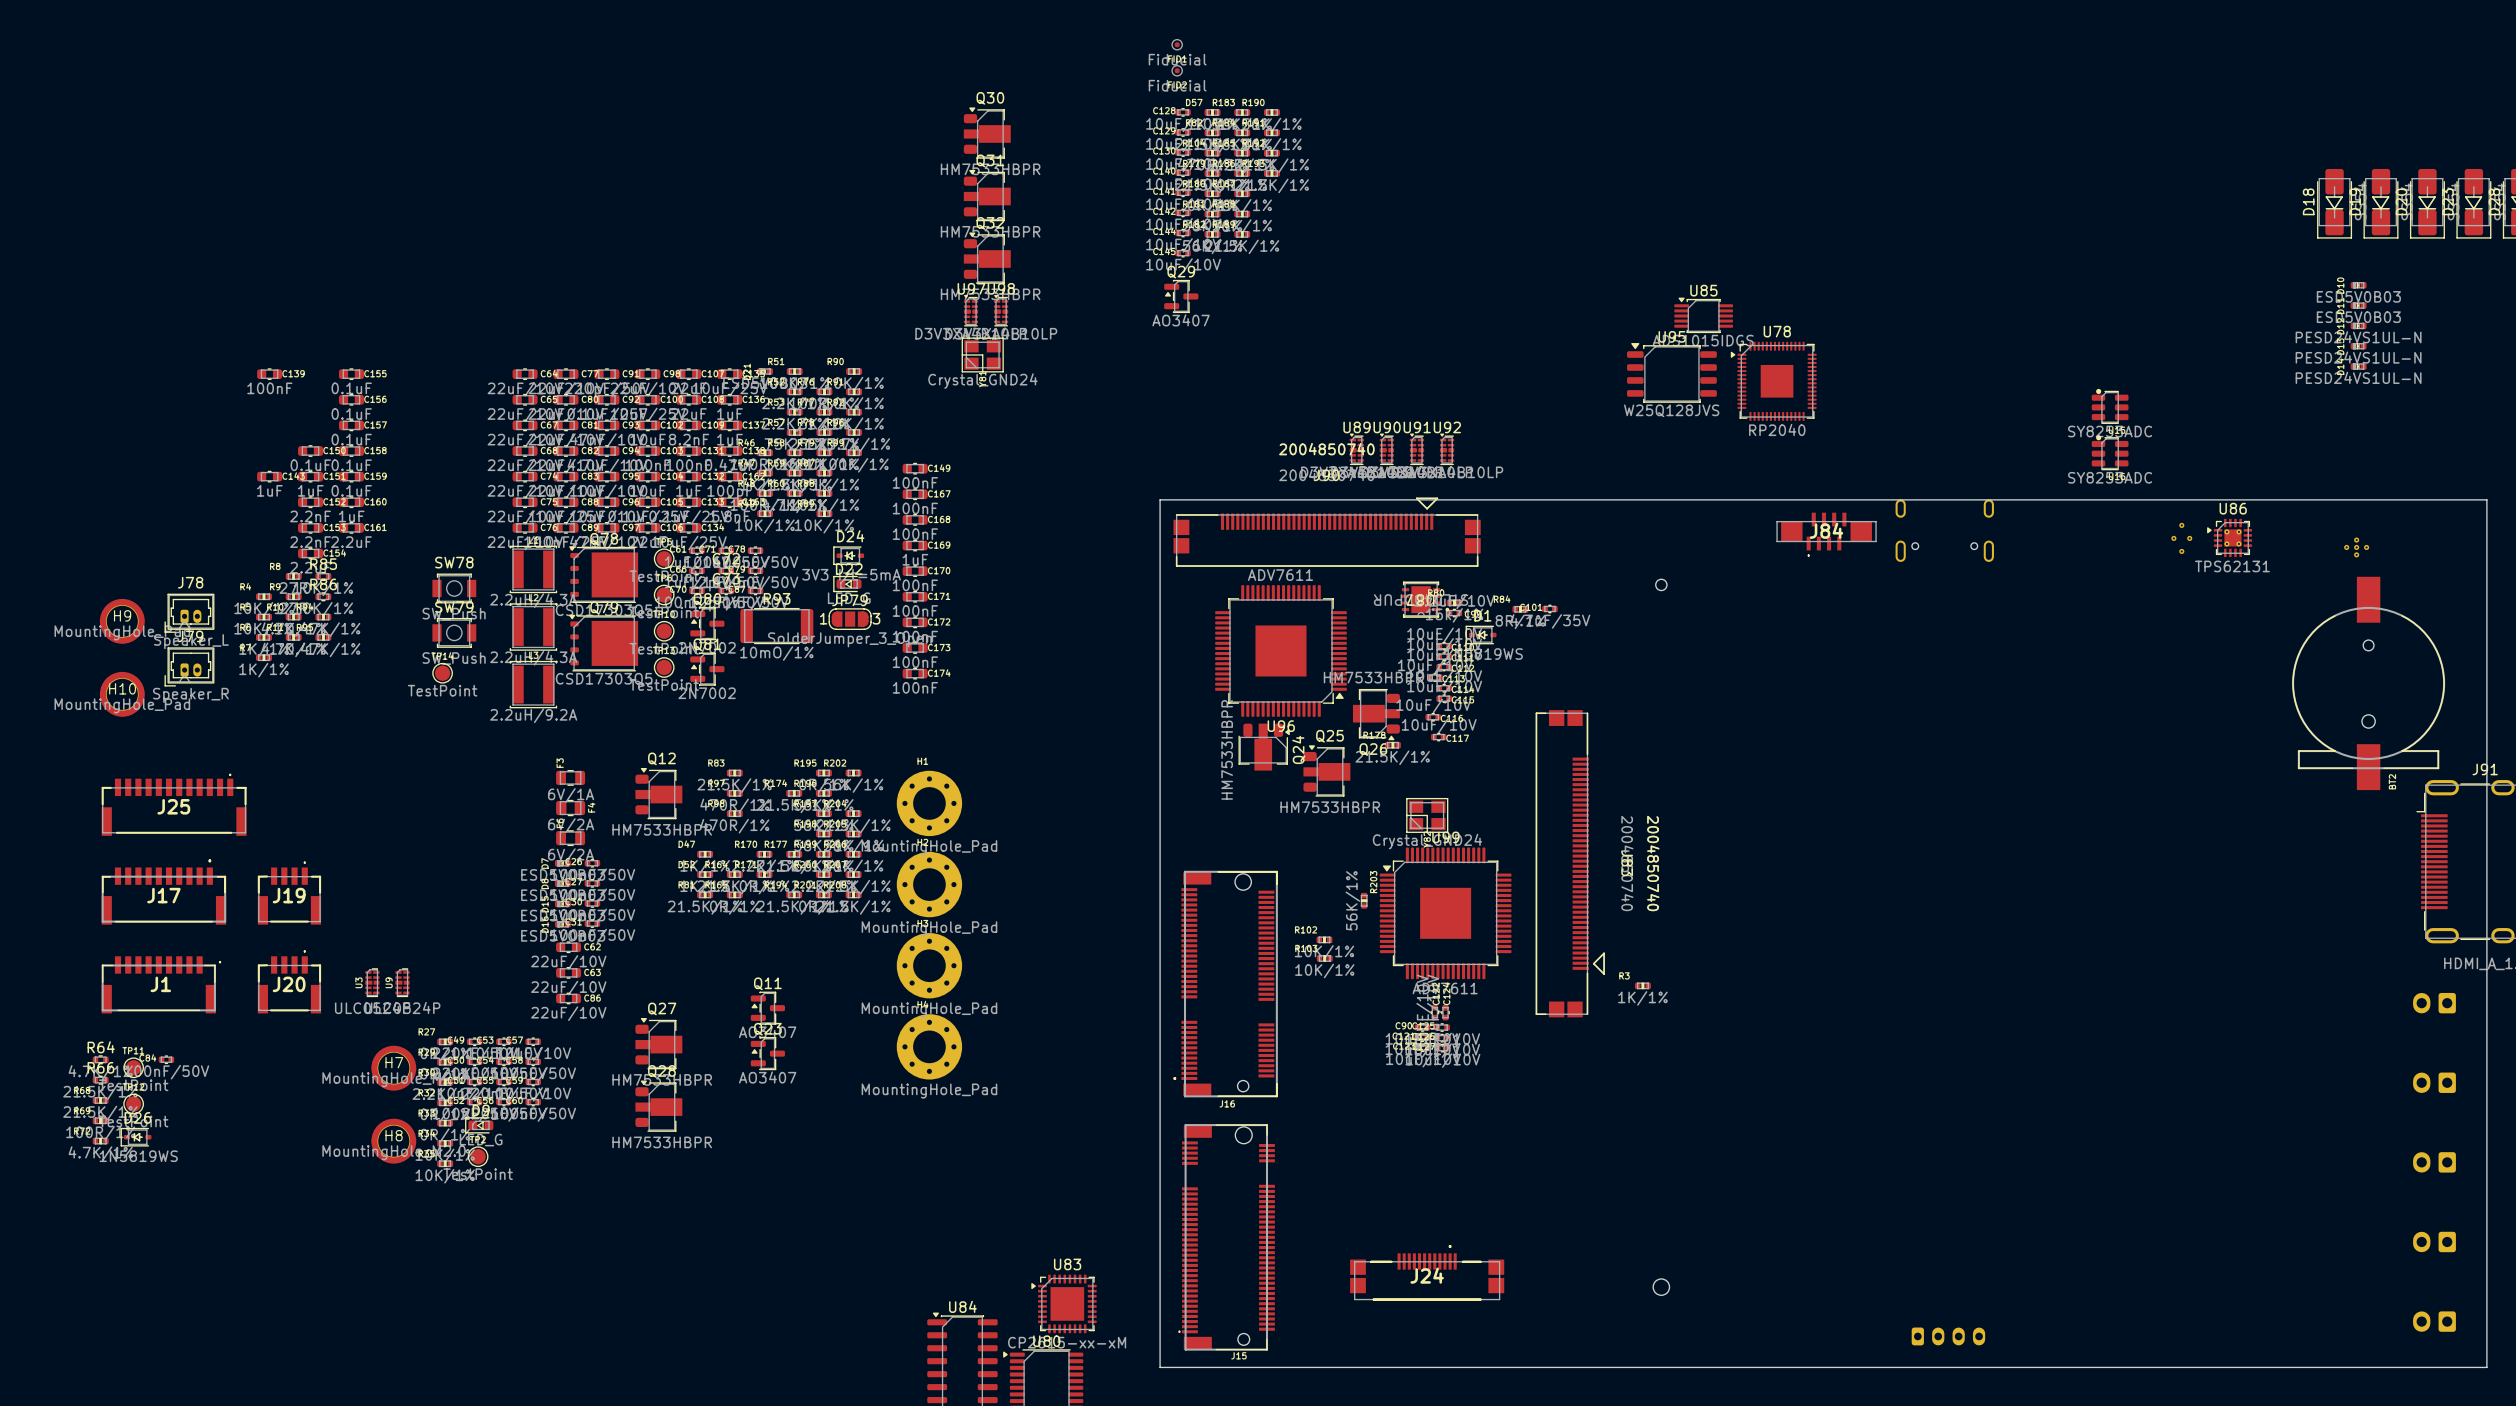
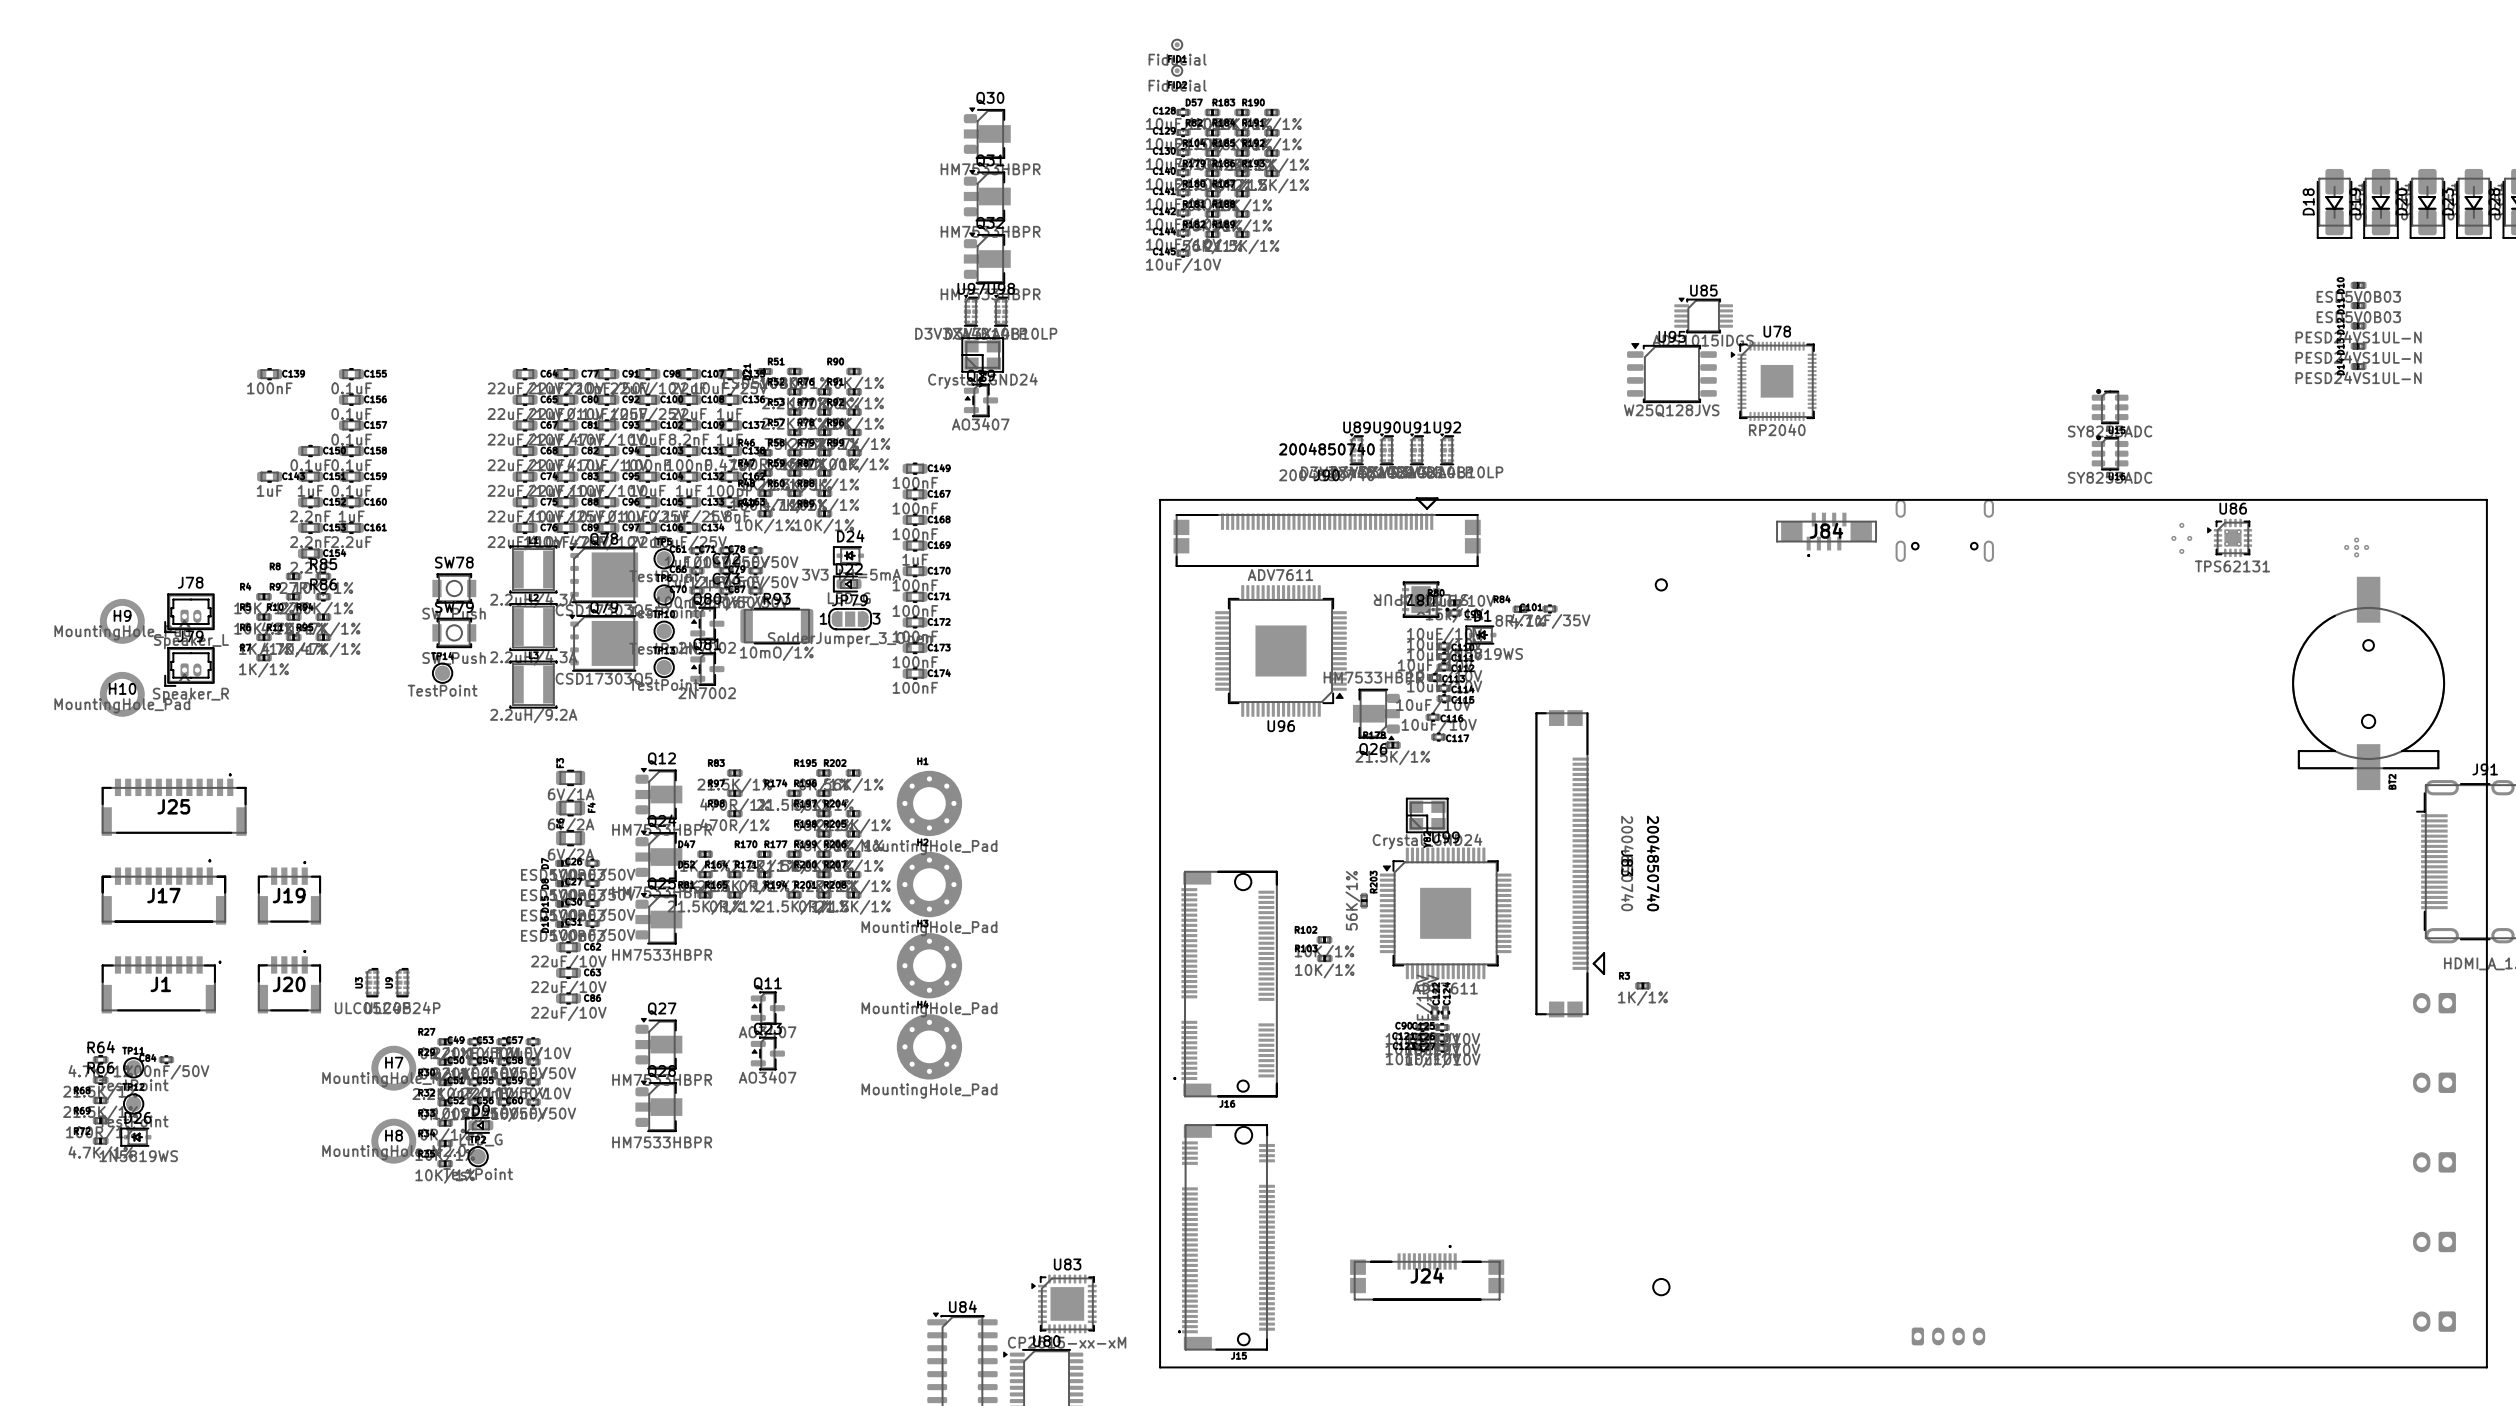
Q29 position: (1181, 296) -> (980, 400)
Q24 rotation: 0° (1264, 747) -> 90° counterclockwise (658, 856)
Q24 position: (1264, 747) -> (658, 856)
Q25 position: (1326, 770) -> (658, 918)

